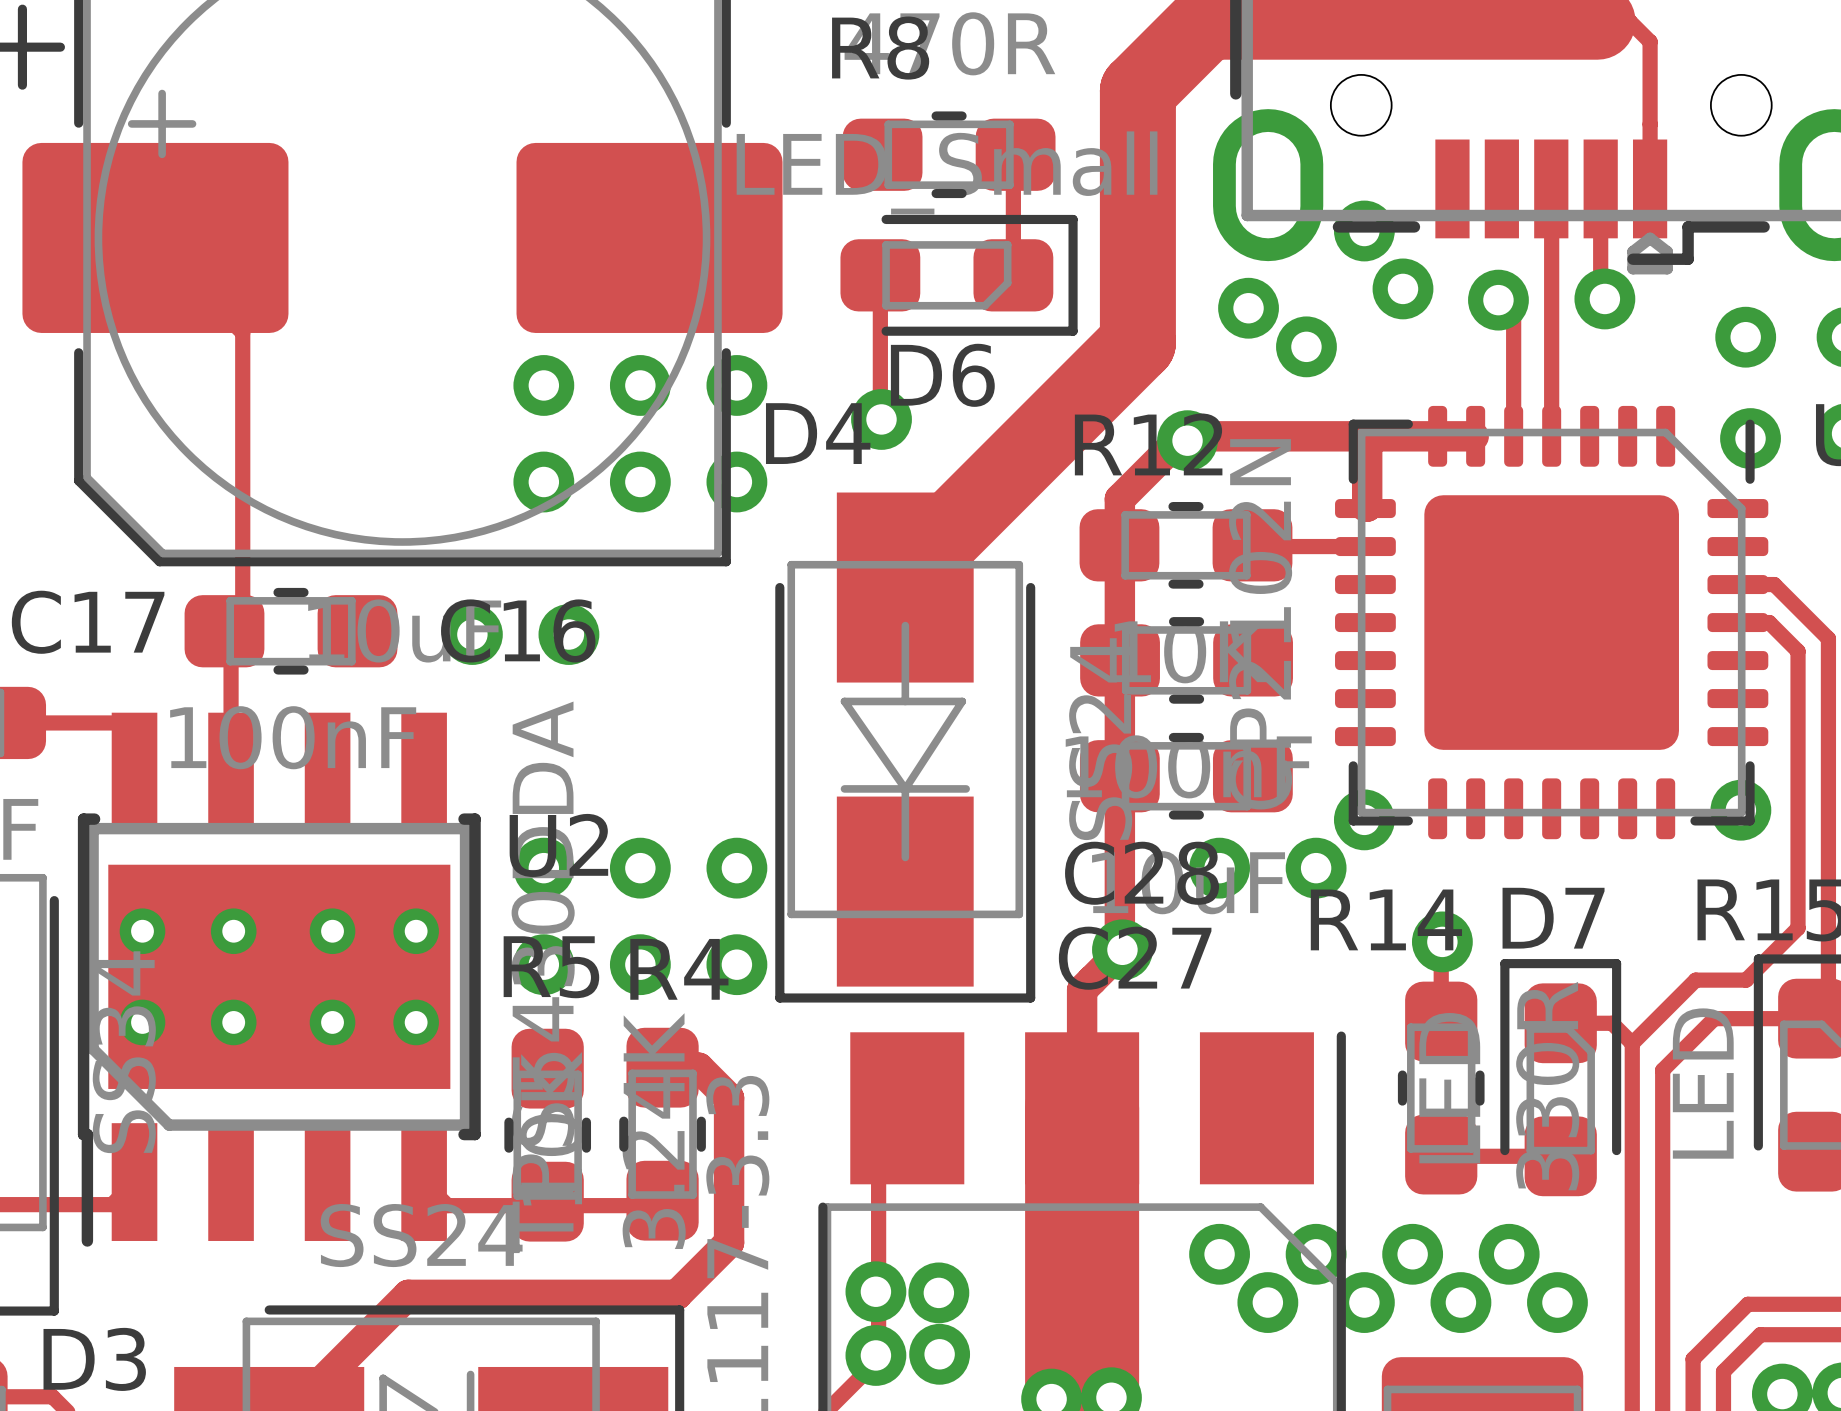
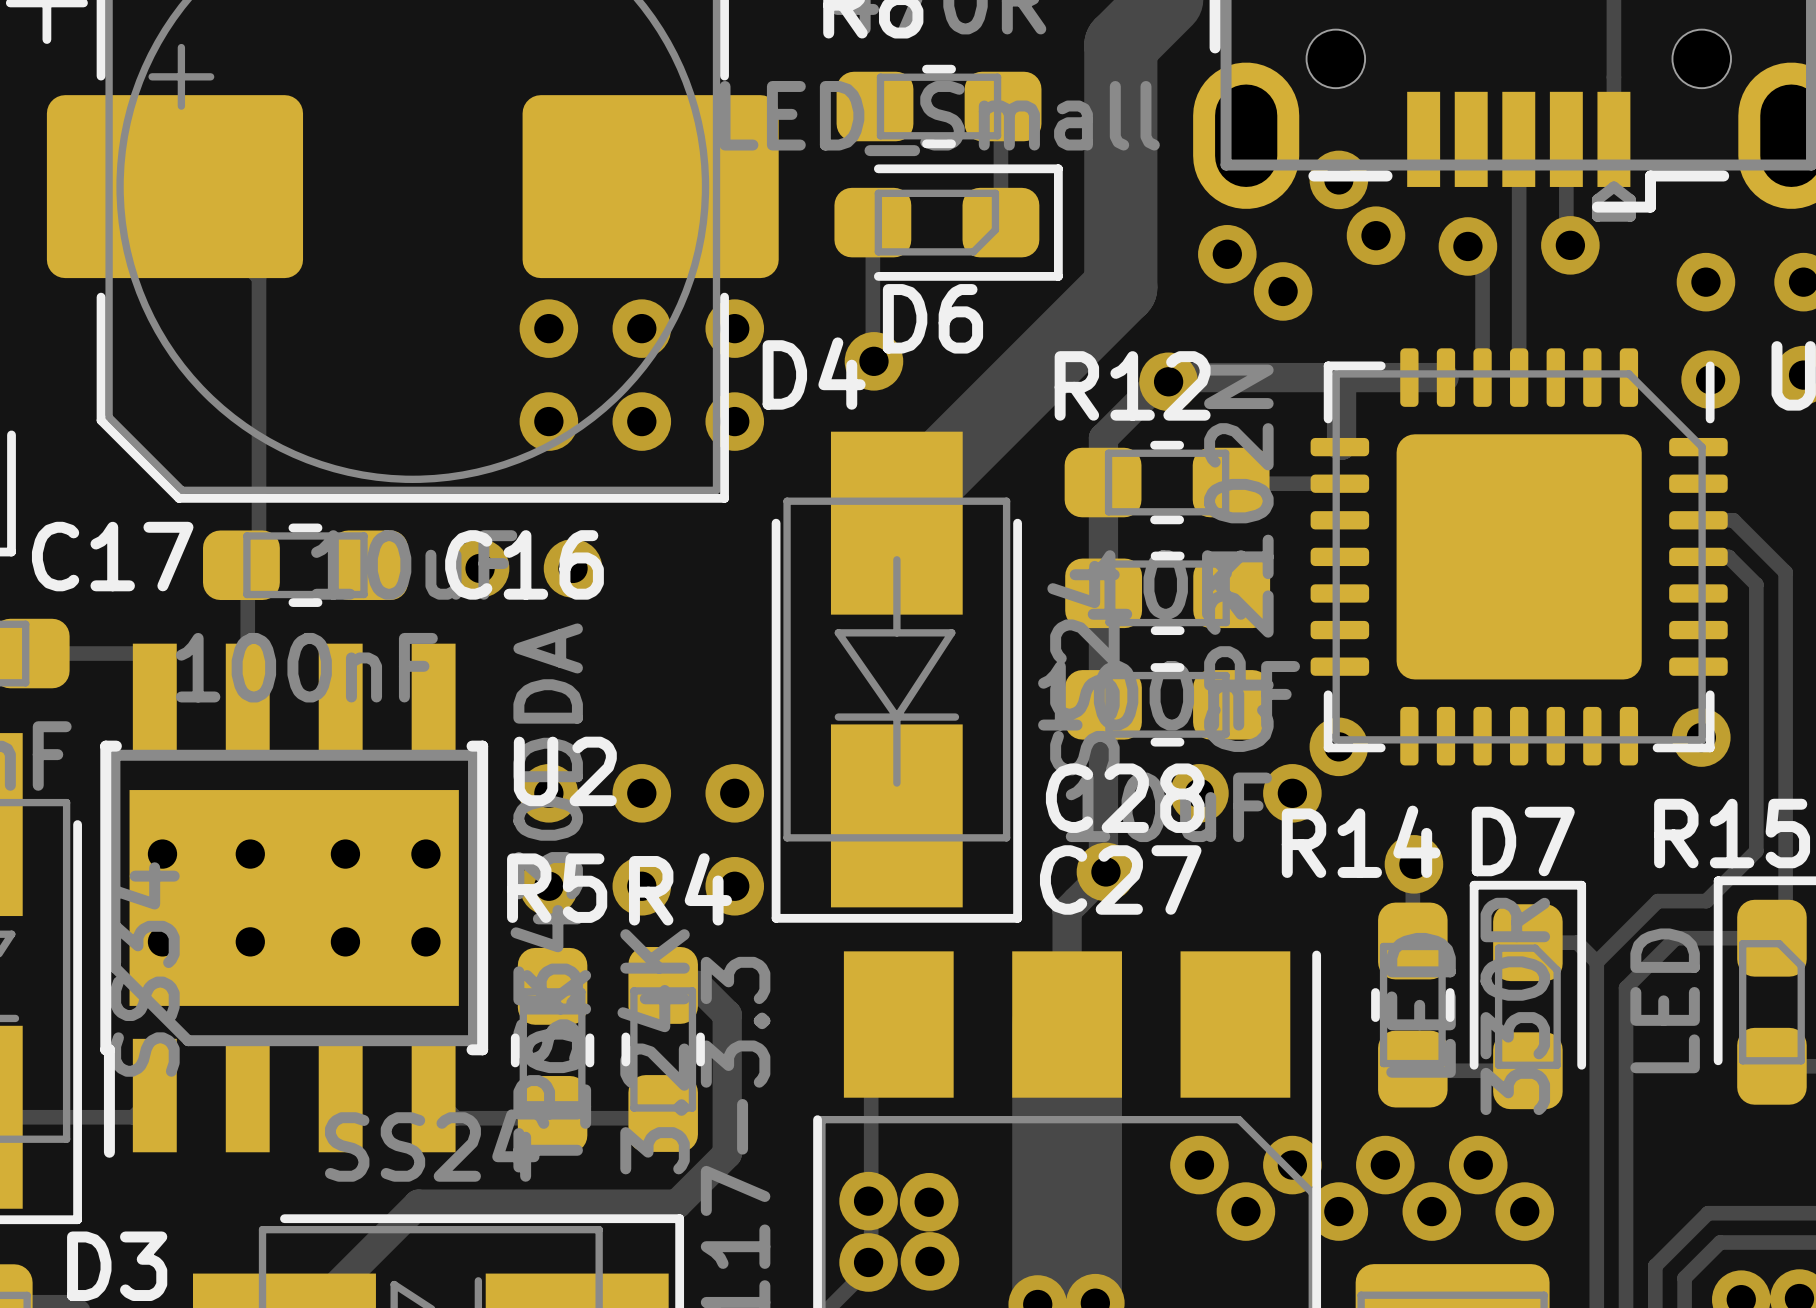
U2 footprint: [77, 712, 481, 1247] -> [100, 643, 489, 1158]

